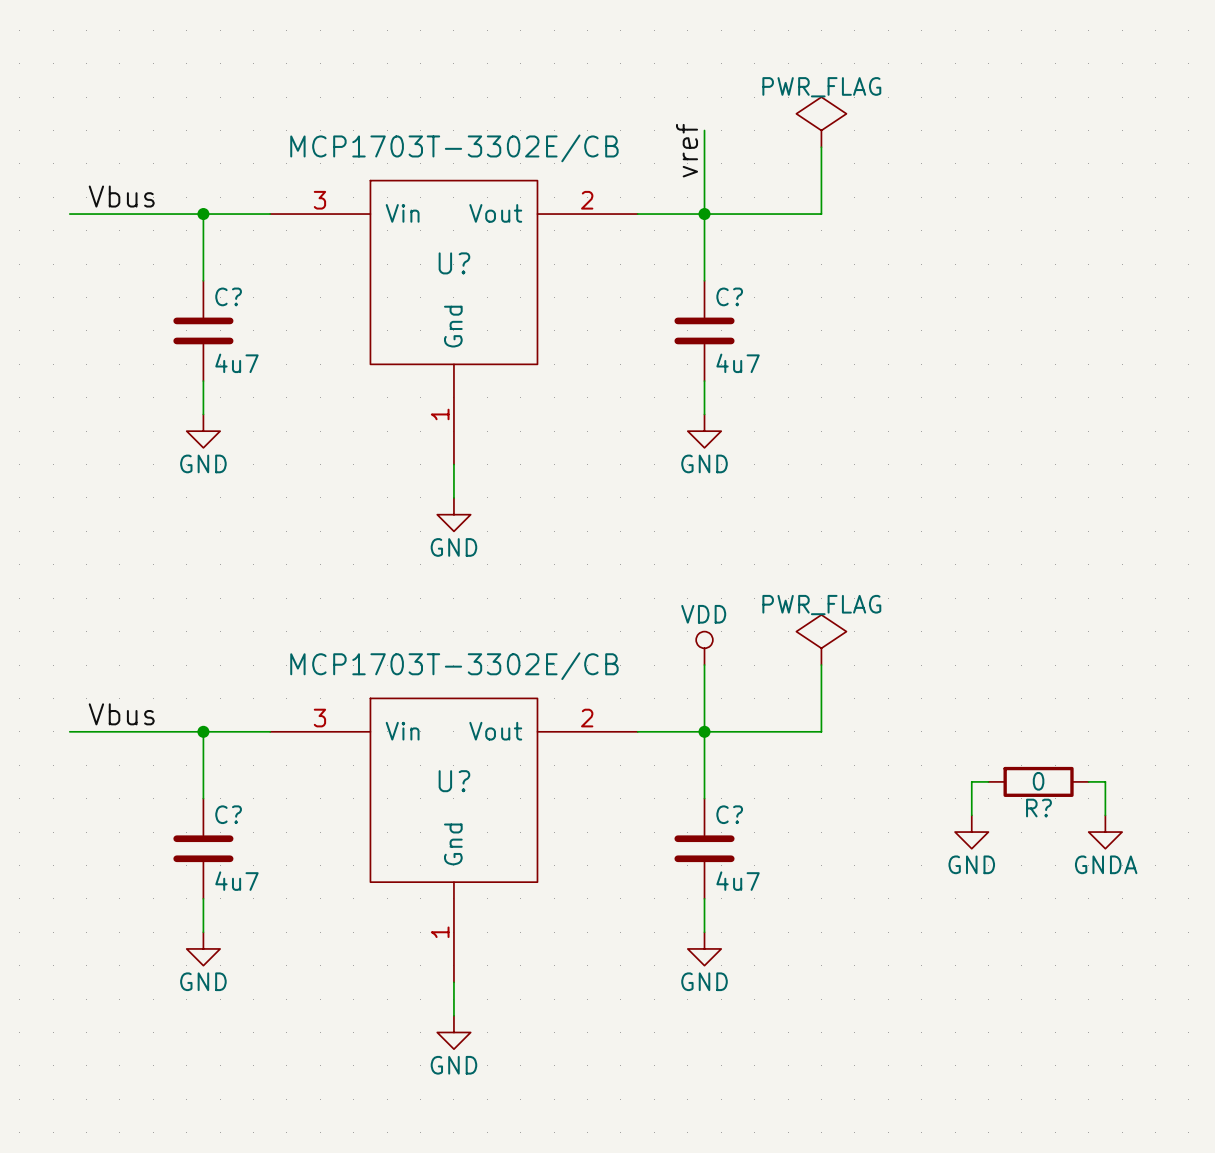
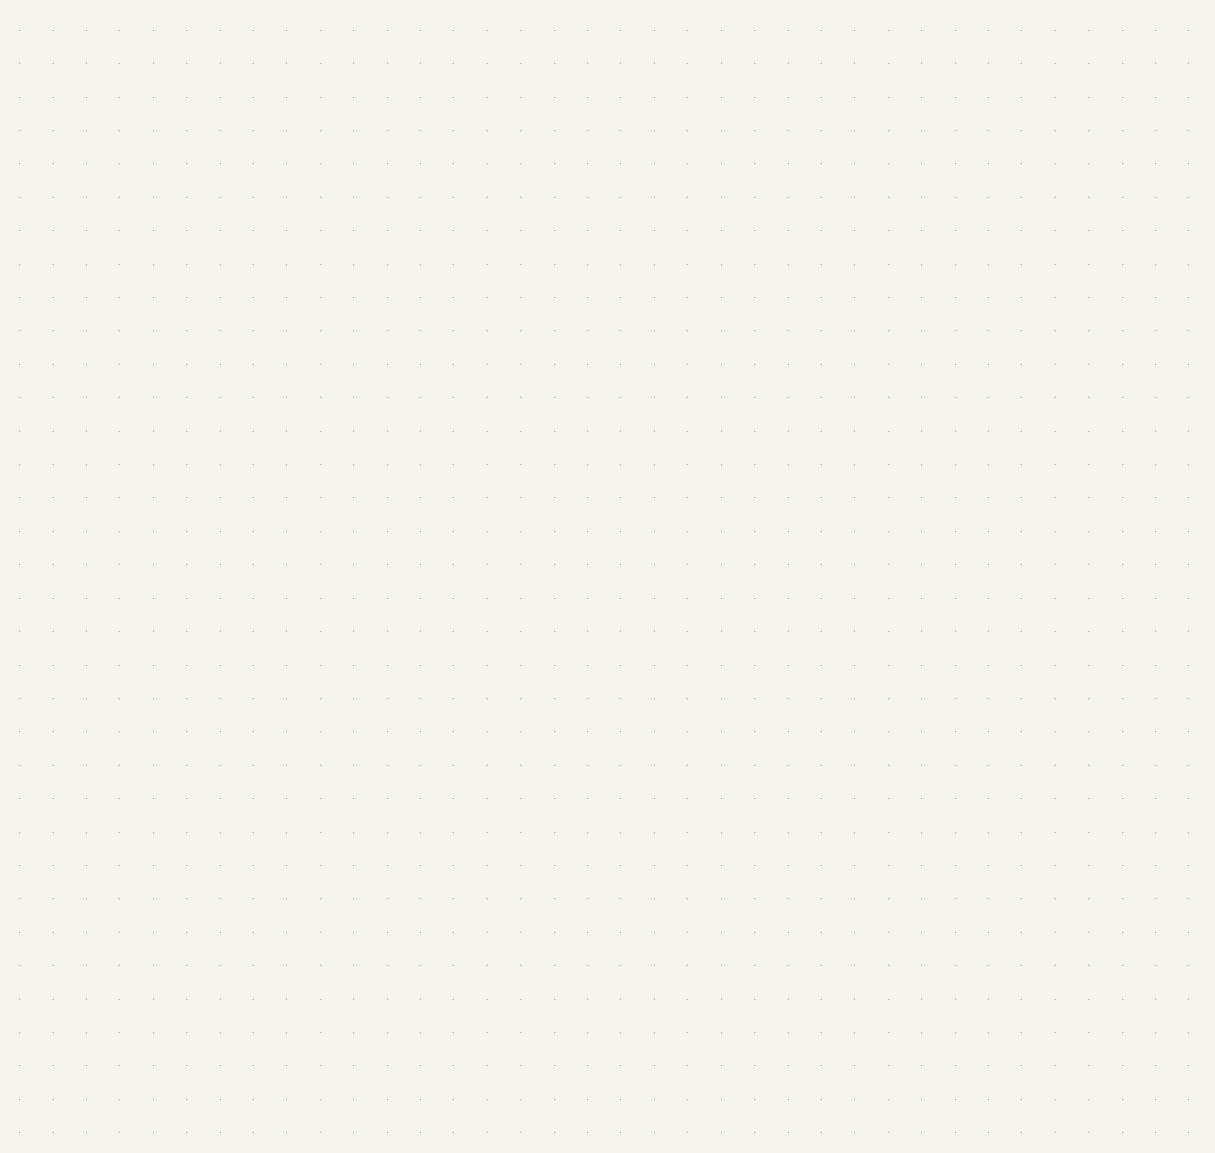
power symbol: PWR_FLAG (821, 122) -> none
wire: (704, 130) (704, 280) -> none
wire: (821, 147) (821, 214) (637, 214) -> none
label: vref (687, 150) -> none
label: Vbus (121, 196) -> none
wire: (69, 214) (270, 214) -> none
wire: (203, 214) (203, 280) -> none
junction: (203, 214) -> none
junction: (704, 214) -> none
U?: MCP1703T-3302E/CB (453, 322) -> none
C?: 4u7 (203, 330) -> none
C?: 4u7 (704, 330) -> none
wire: (203, 381) (203, 414) -> none
wire: (704, 381) (704, 414) -> none
power symbol: GND (203, 431) -> none
power symbol: GND (704, 431) -> none
wire: (453, 464) (453, 497) -> none
power symbol: GND (453, 514) -> none
power symbol: PWR_FLAG (821, 639) -> none
power symbol: VDD (704, 648) -> none
wire: (704, 665) (704, 798) -> none
wire: (821, 665) (821, 731) (637, 731) -> none
label: Vbus (121, 714) -> none
wire: (69, 731) (270, 731) -> none
wire: (203, 731) (203, 798) -> none
junction: (203, 731) -> none
junction: (704, 731) -> none
wire: (988, 781) (971, 781) (971, 815) -> none
R?: 0 (1038, 781) -> none
wire: (1088, 781) (1105, 781) (1105, 815) -> none
power symbol: GND (971, 832) -> none
power symbol: GNDA (1105, 832) -> none
U?: MCP1703T-3302E/CB (453, 840) -> none
C?: 4u7 (203, 848) -> none
C?: 4u7 (704, 848) -> none
wire: (203, 898) (203, 932) -> none
wire: (704, 898) (704, 932) -> none
power symbol: GND (203, 948) -> none
power symbol: GND (704, 948) -> none
wire: (453, 982) (453, 1015) -> none
power symbol: GND (453, 1032) -> none

